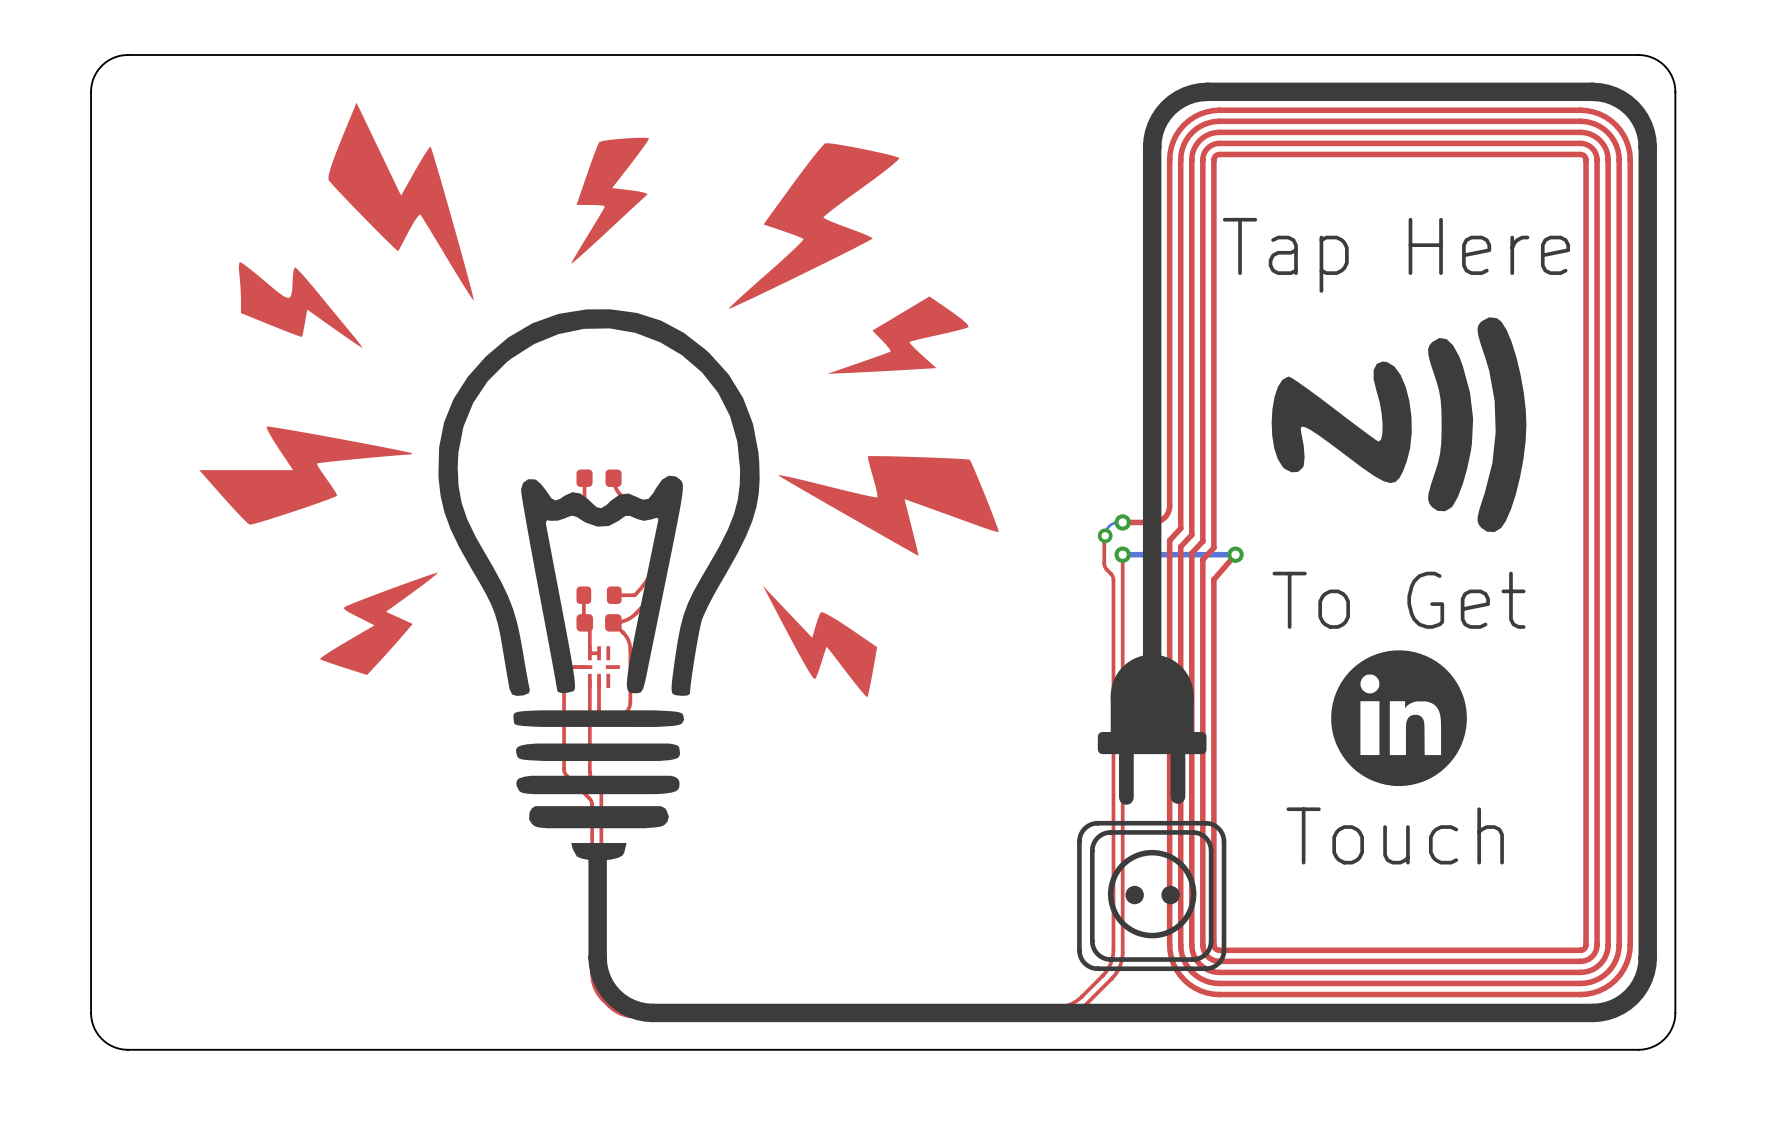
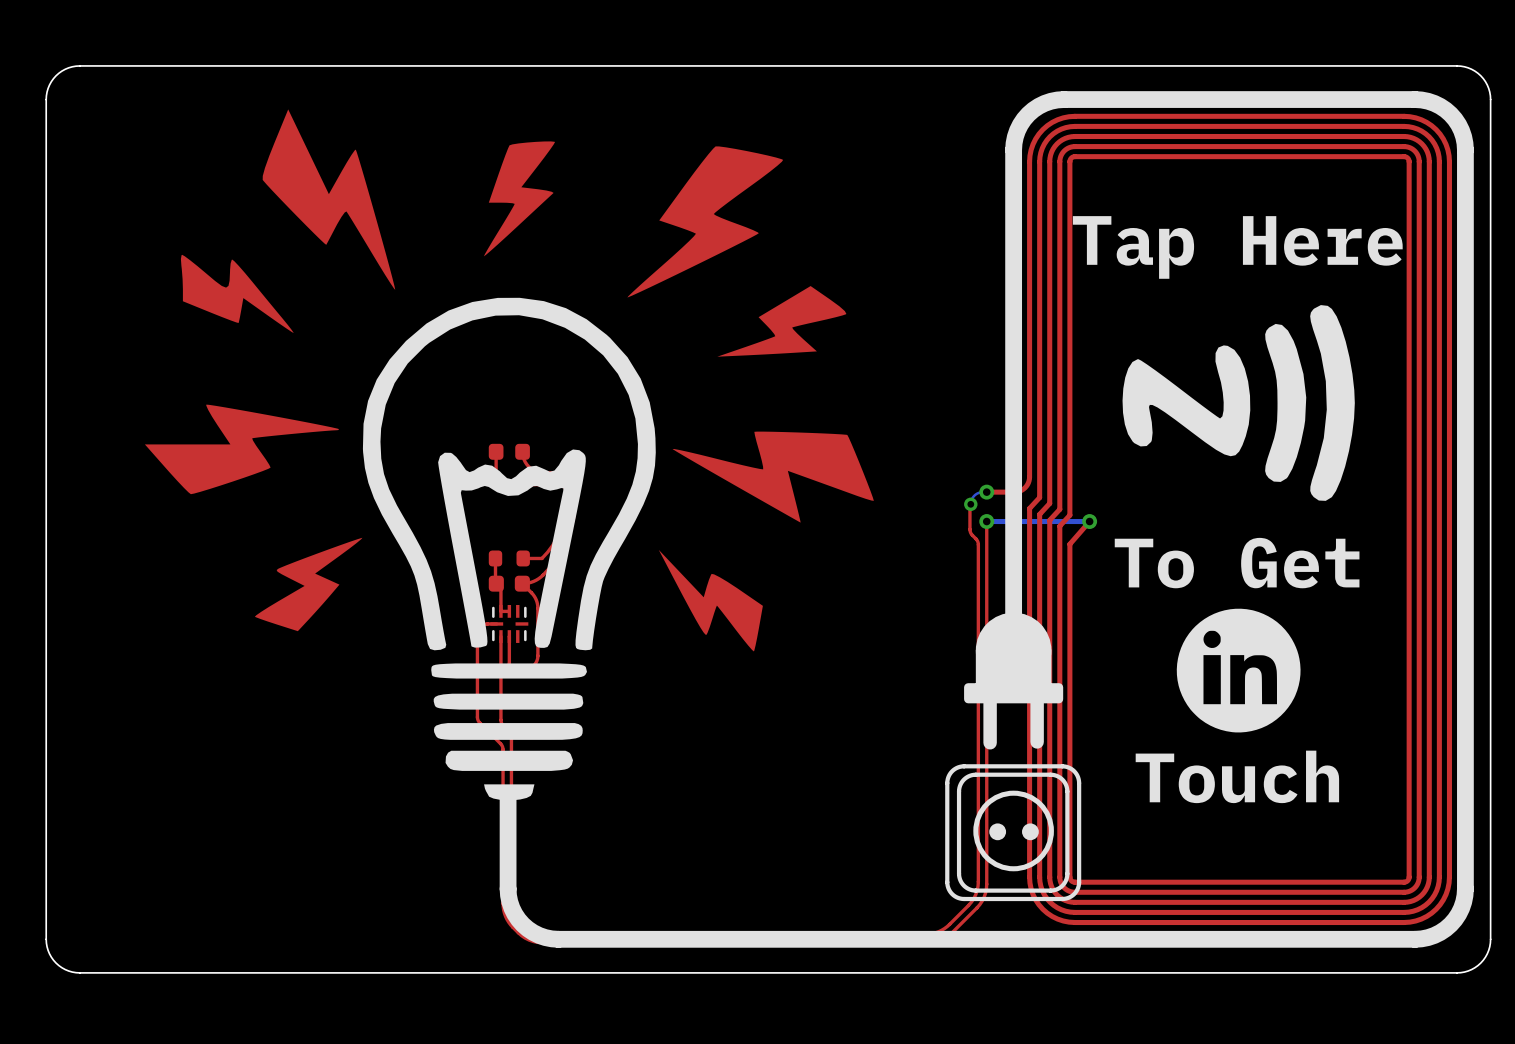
part footprint: [578, 646, 620, 688] -> [490, 604, 529, 643]

